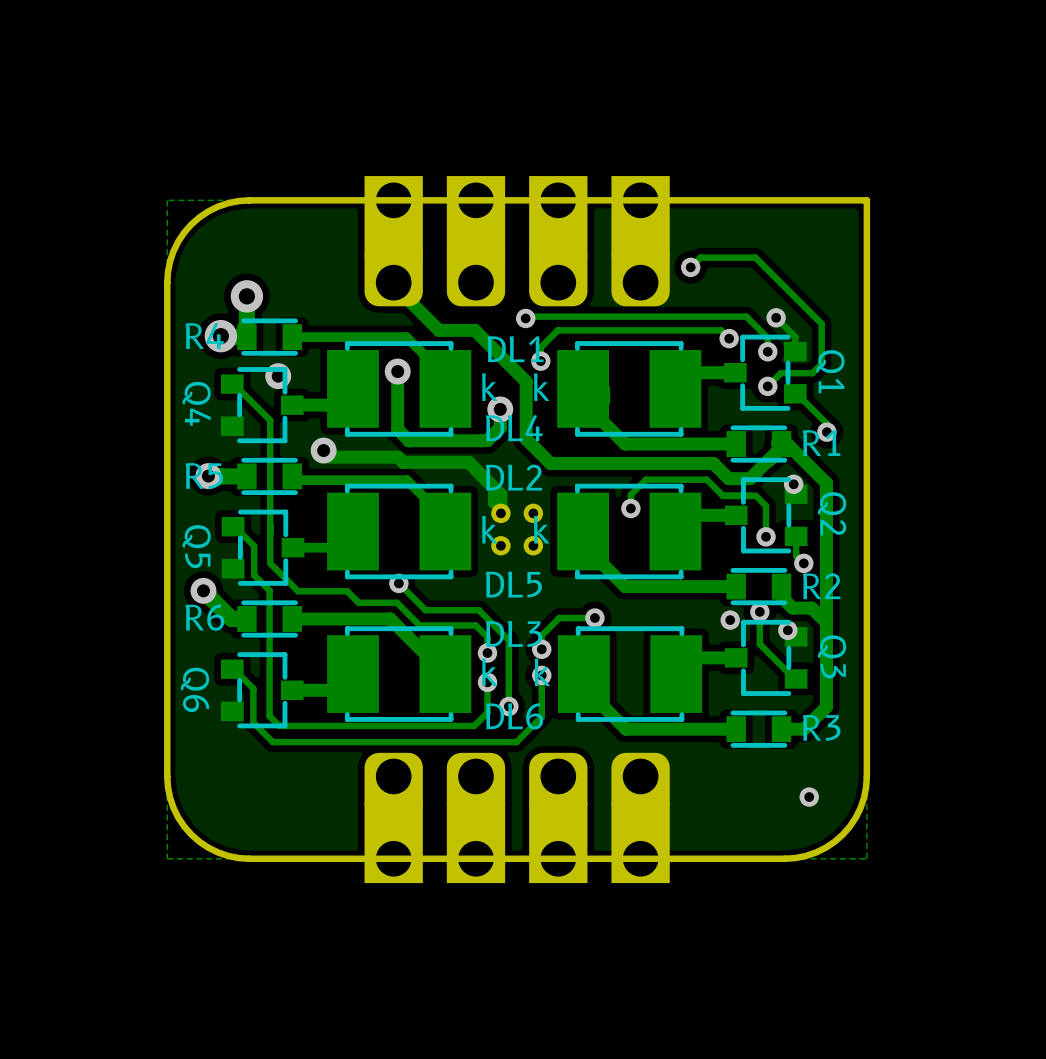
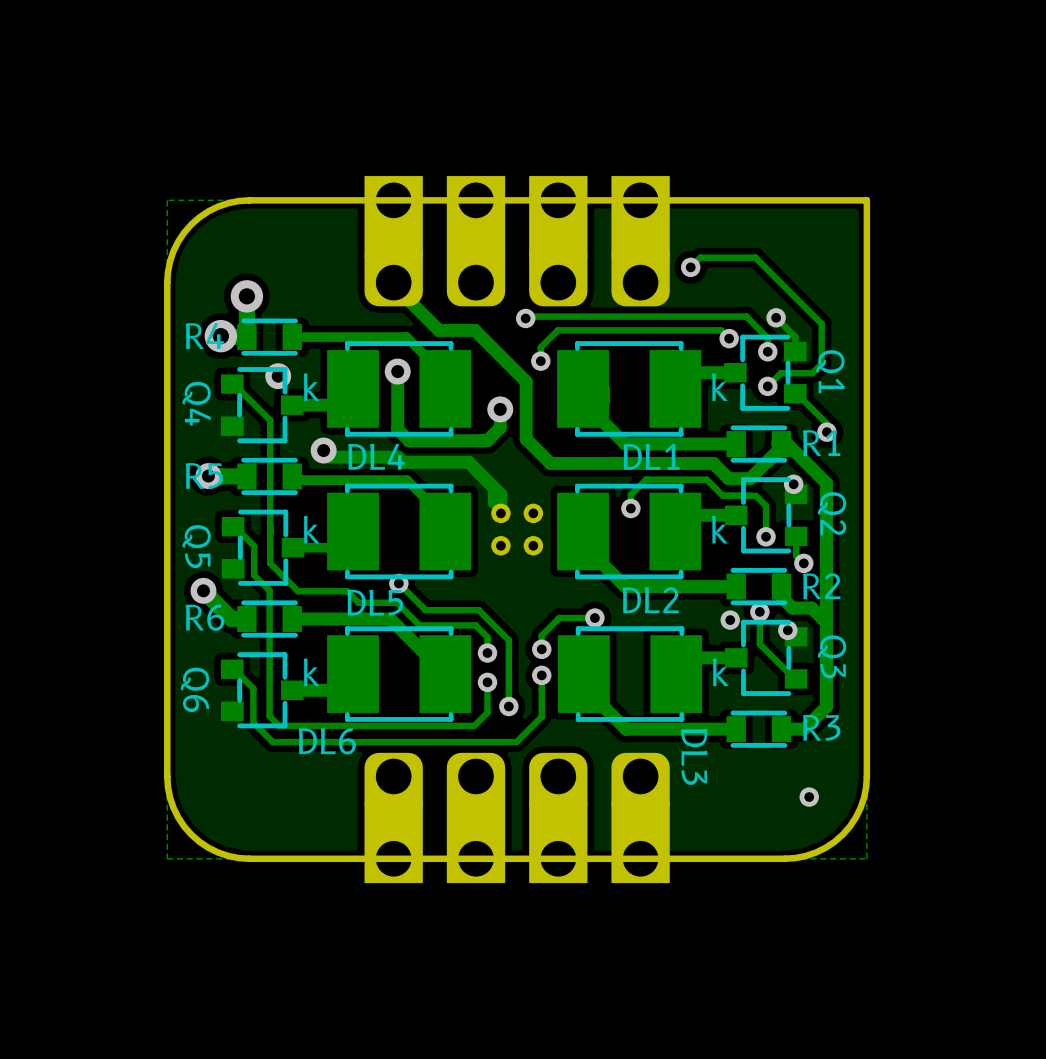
DL1 name position: DL1 (515, 349) -> DL1 (651, 456)
DL4 rotation: 0° (399, 388) -> 180° (399, 388)
DL1 rotation: 0° (629, 388) -> 180° (629, 388)
DL4 name position: DL4 (514, 428) -> DL4 (376, 456)
DL2 name position: DL2 (513, 477) -> DL2 (650, 600)
DL5 rotation: 0° (399, 531) -> 180° (399, 531)
DL2 rotation: 0° (629, 531) -> 180° (629, 531)
DL5 name position: DL5 (513, 584) -> DL5 (375, 602)
DL3 name position: DL3 (513, 633) -> DL3 (694, 756)
DL6 rotation: 0° (399, 674) -> 180° (399, 674)
DL3 rotation: 0° (630, 674) -> 180° (630, 674)
DL6 name position: DL6 (514, 716) -> DL6 (327, 741)

